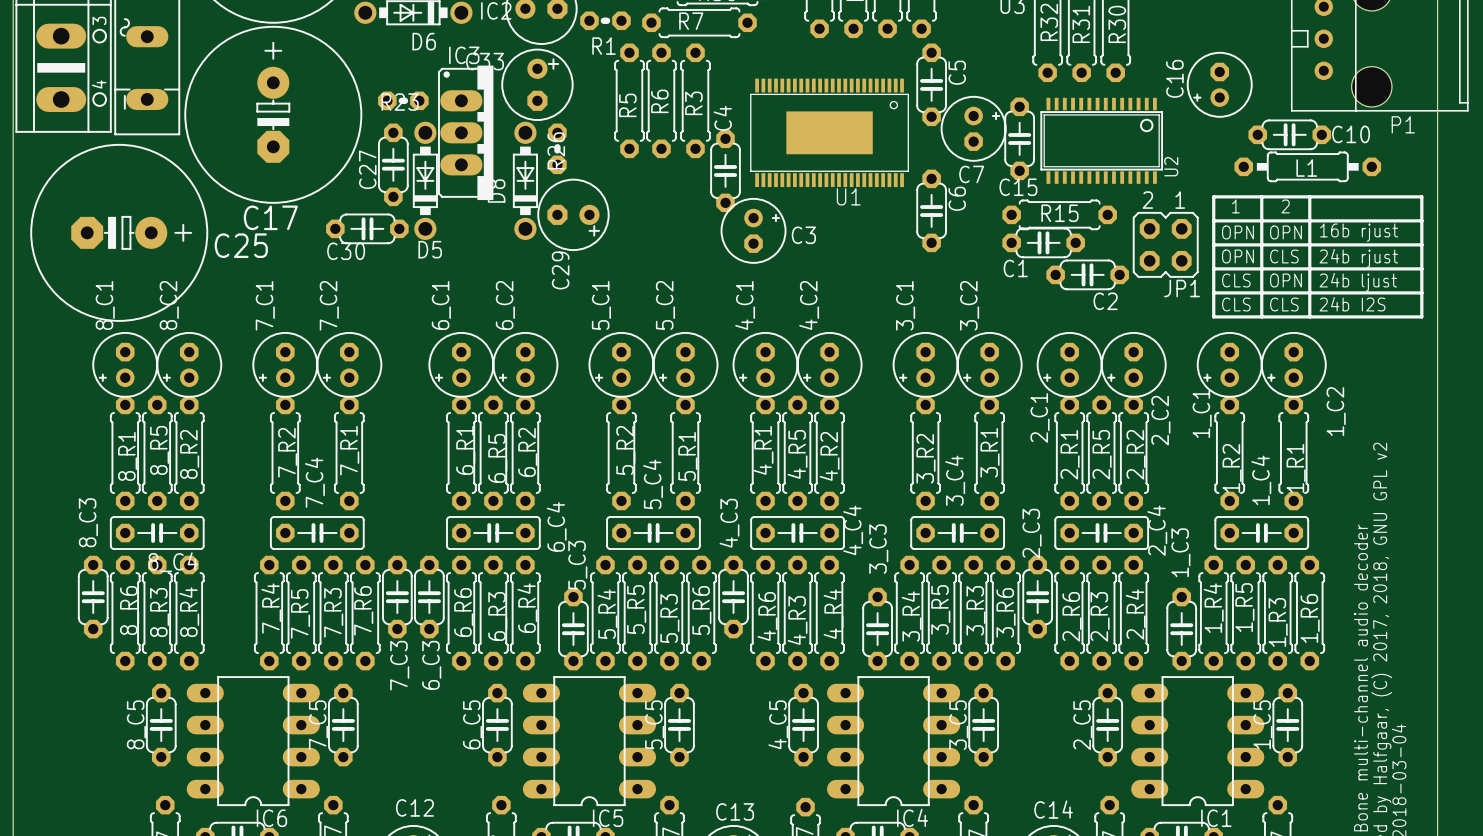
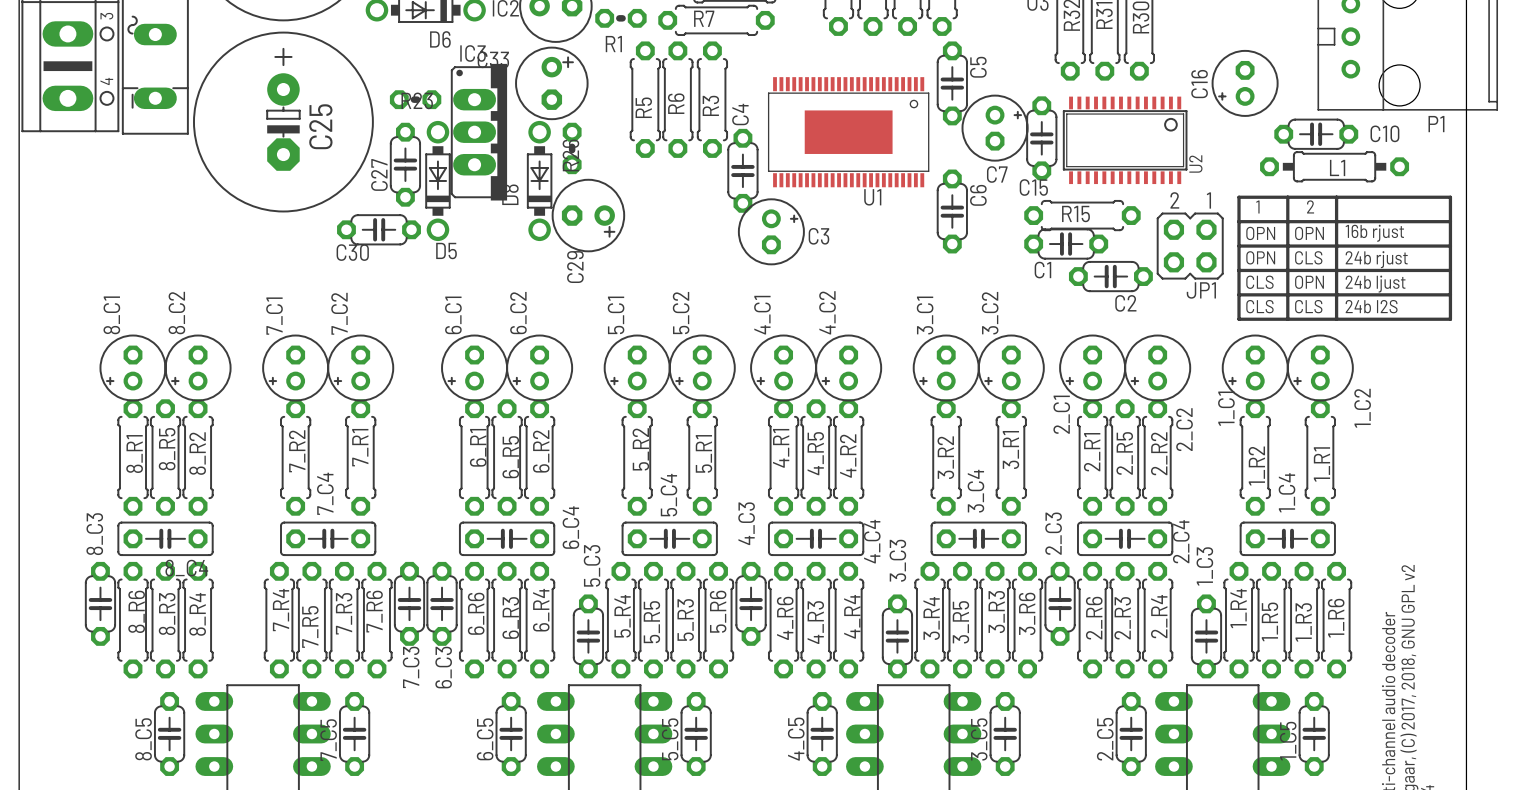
C17: (273, 114) -> none
C25 rotation: 0° (119, 232) -> 90° counterclockwise (283, 122)
C25 position: (119, 232) -> (283, 122)
C25 name position: C25 (241, 245) -> C25 (320, 126)

